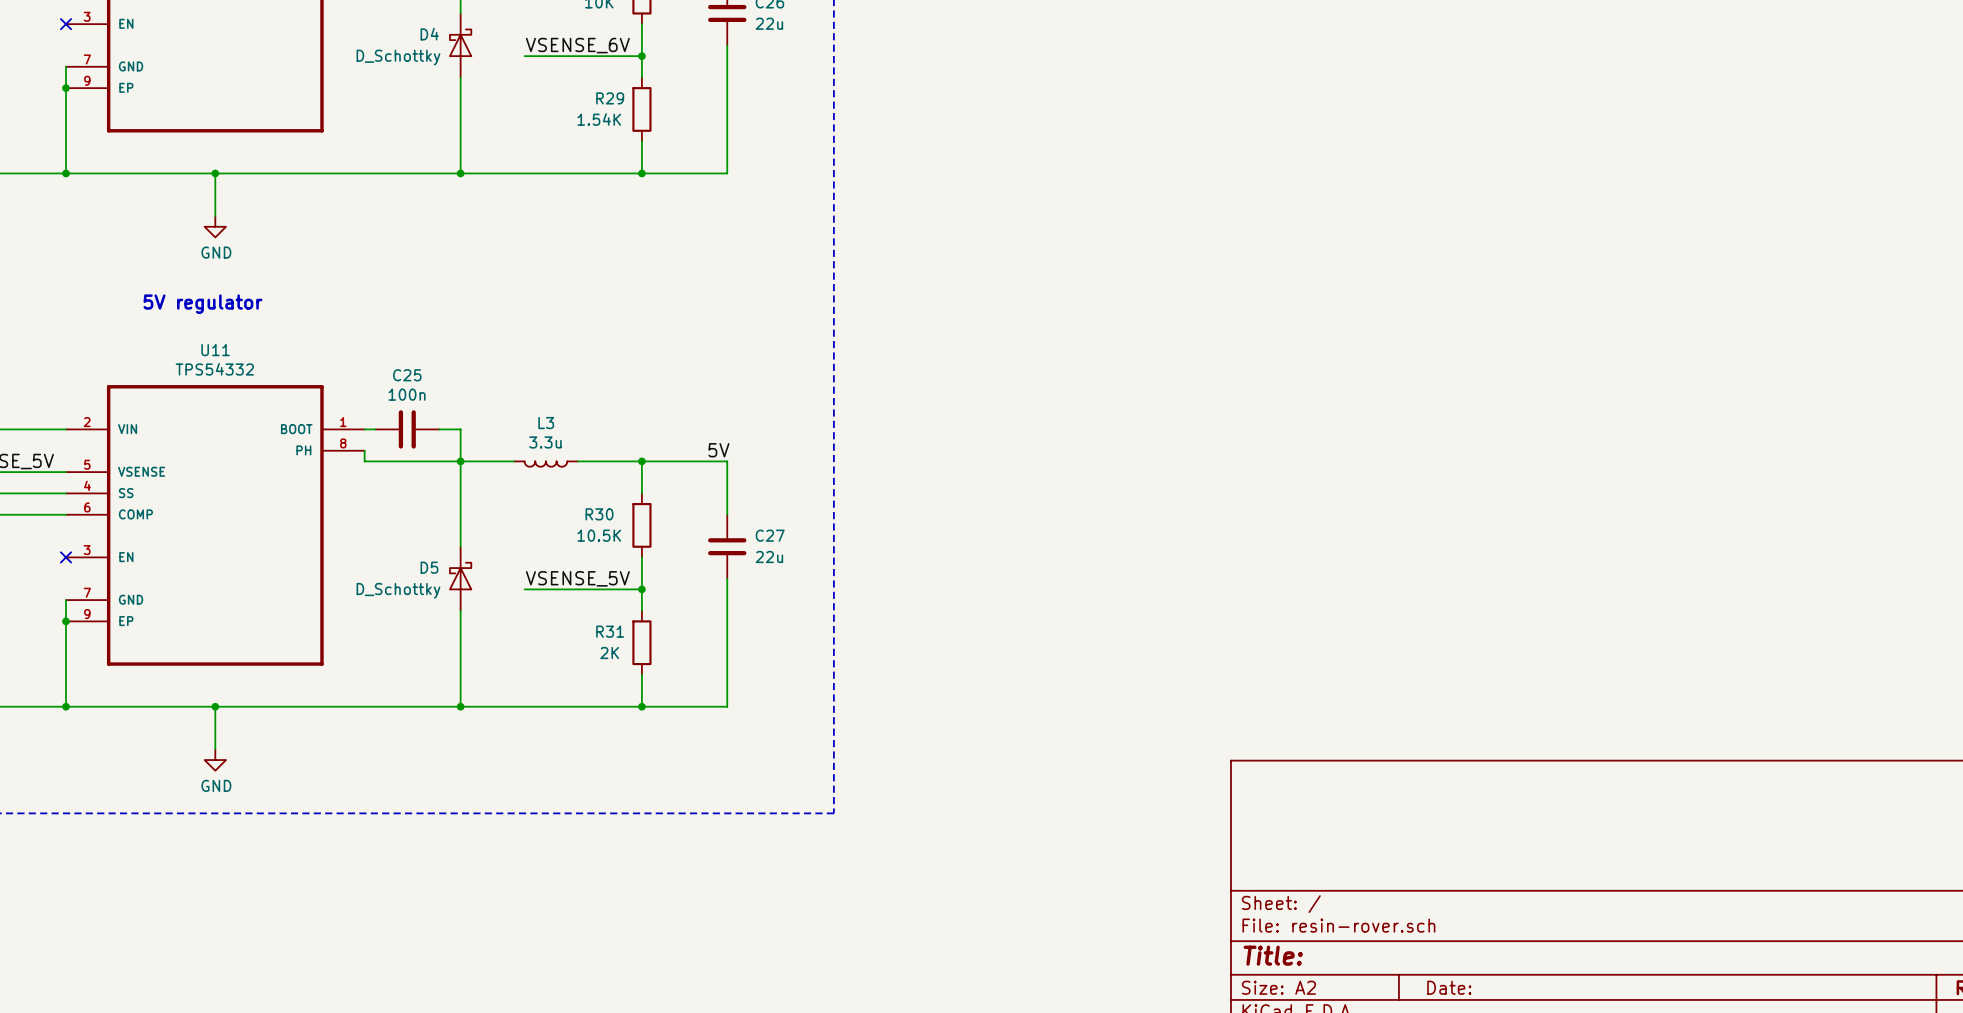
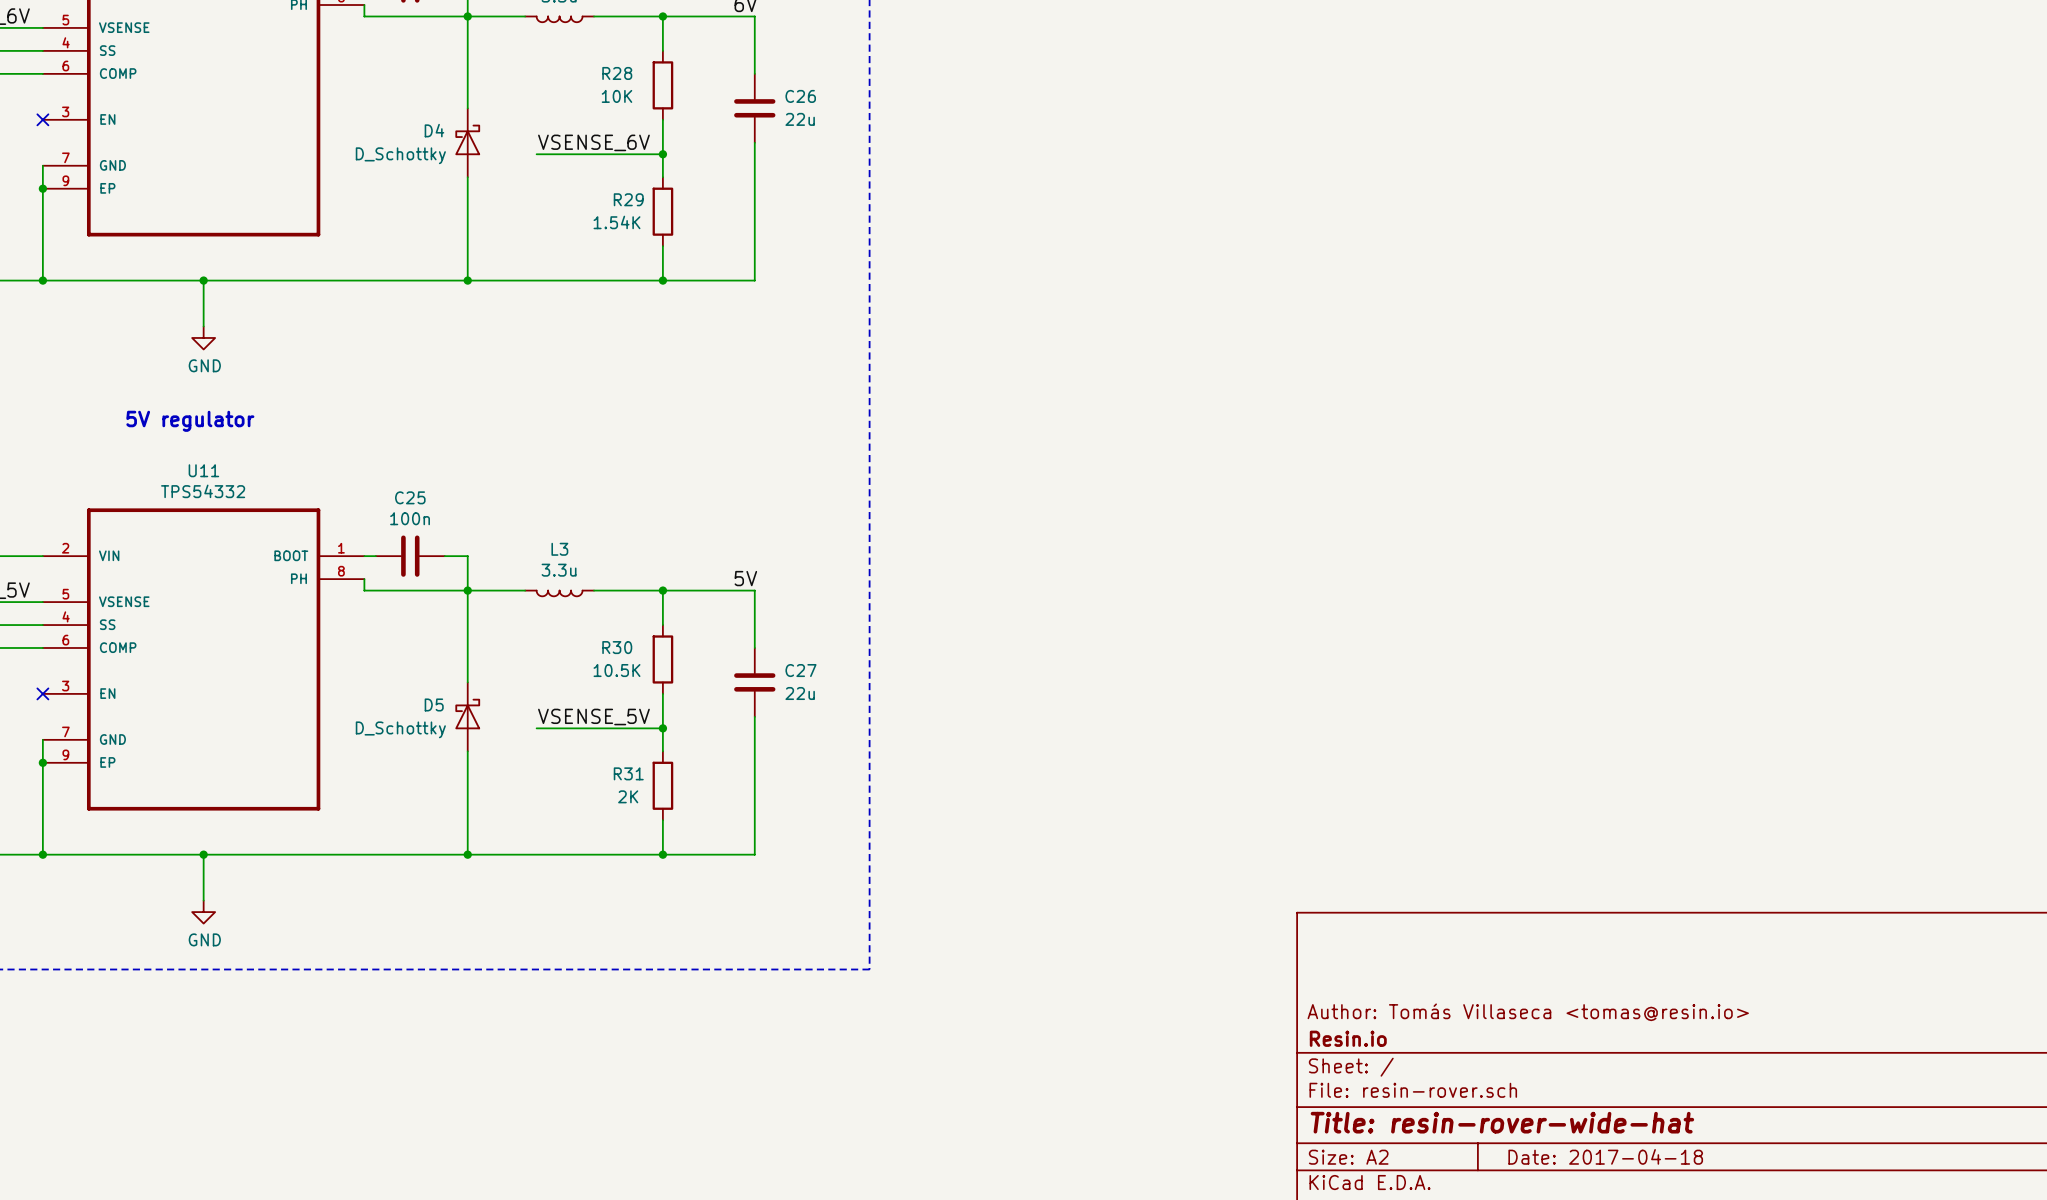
title block: none -> Author: Tomás Villaseca <tomas@resin.io> (1528, 1012)
title block: none -> Resin.io (1348, 1038)
title block: Title: (1273, 955) -> Title: resin-rover-wide-hat (1502, 1122)
title block: Date: (1449, 987) -> Date: 2017-04-18 (1605, 1156)

